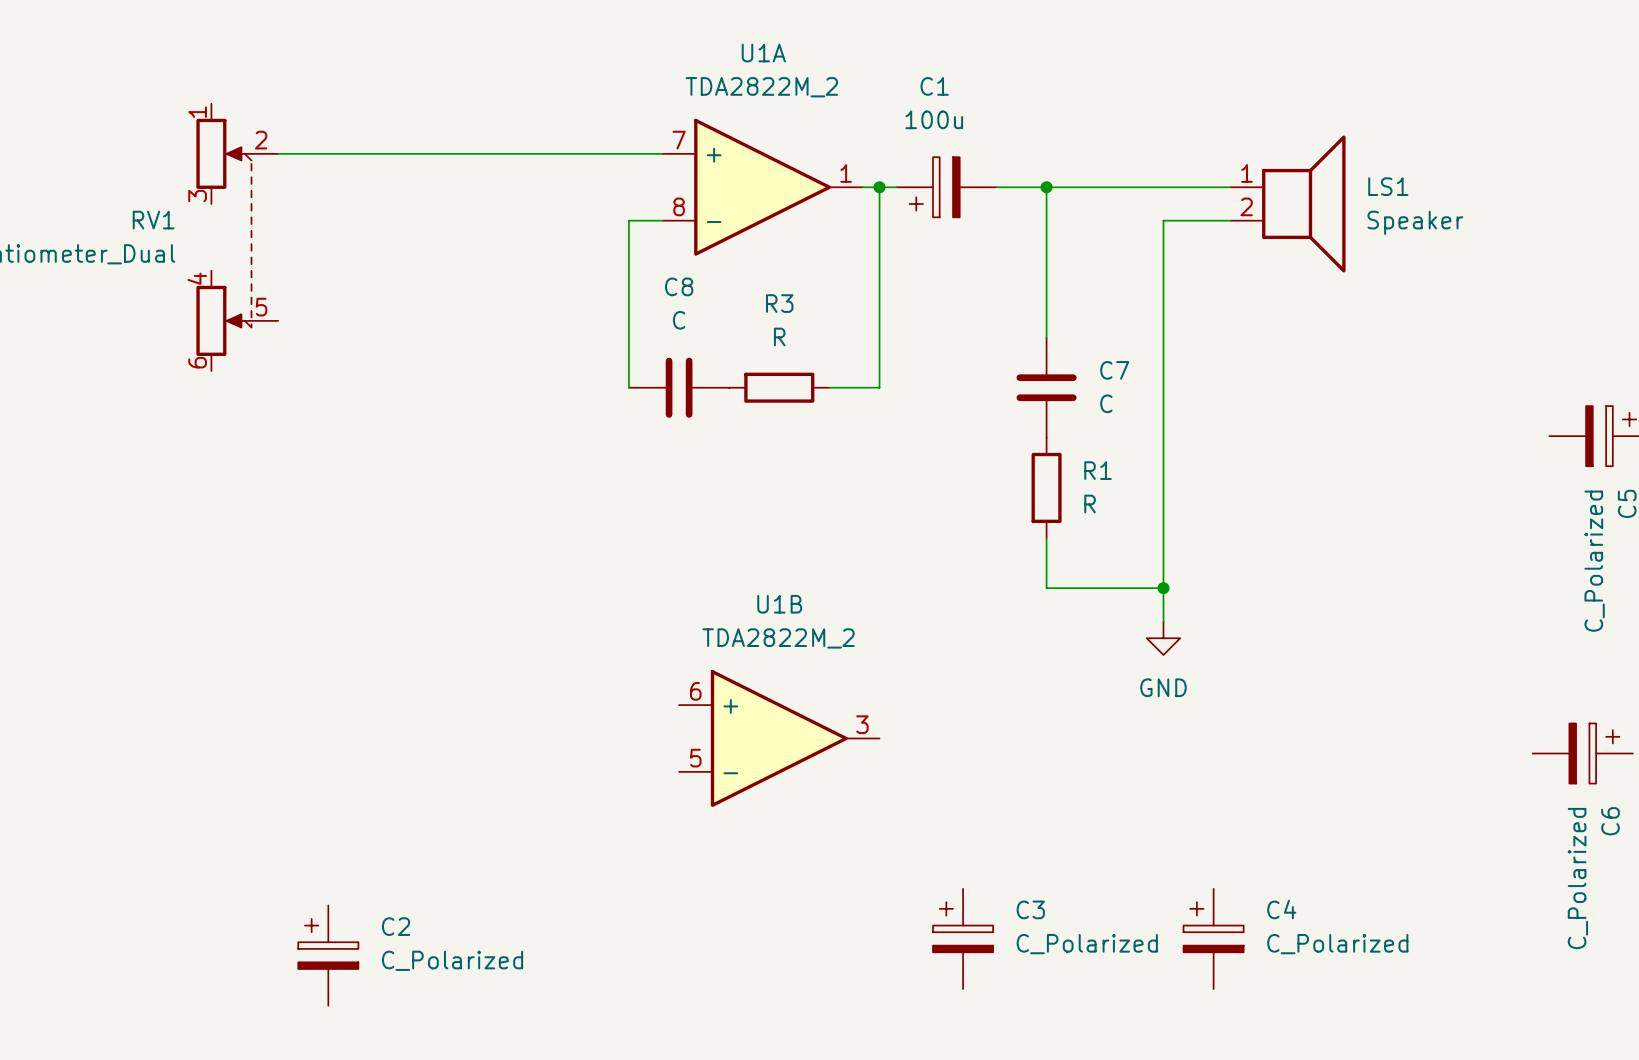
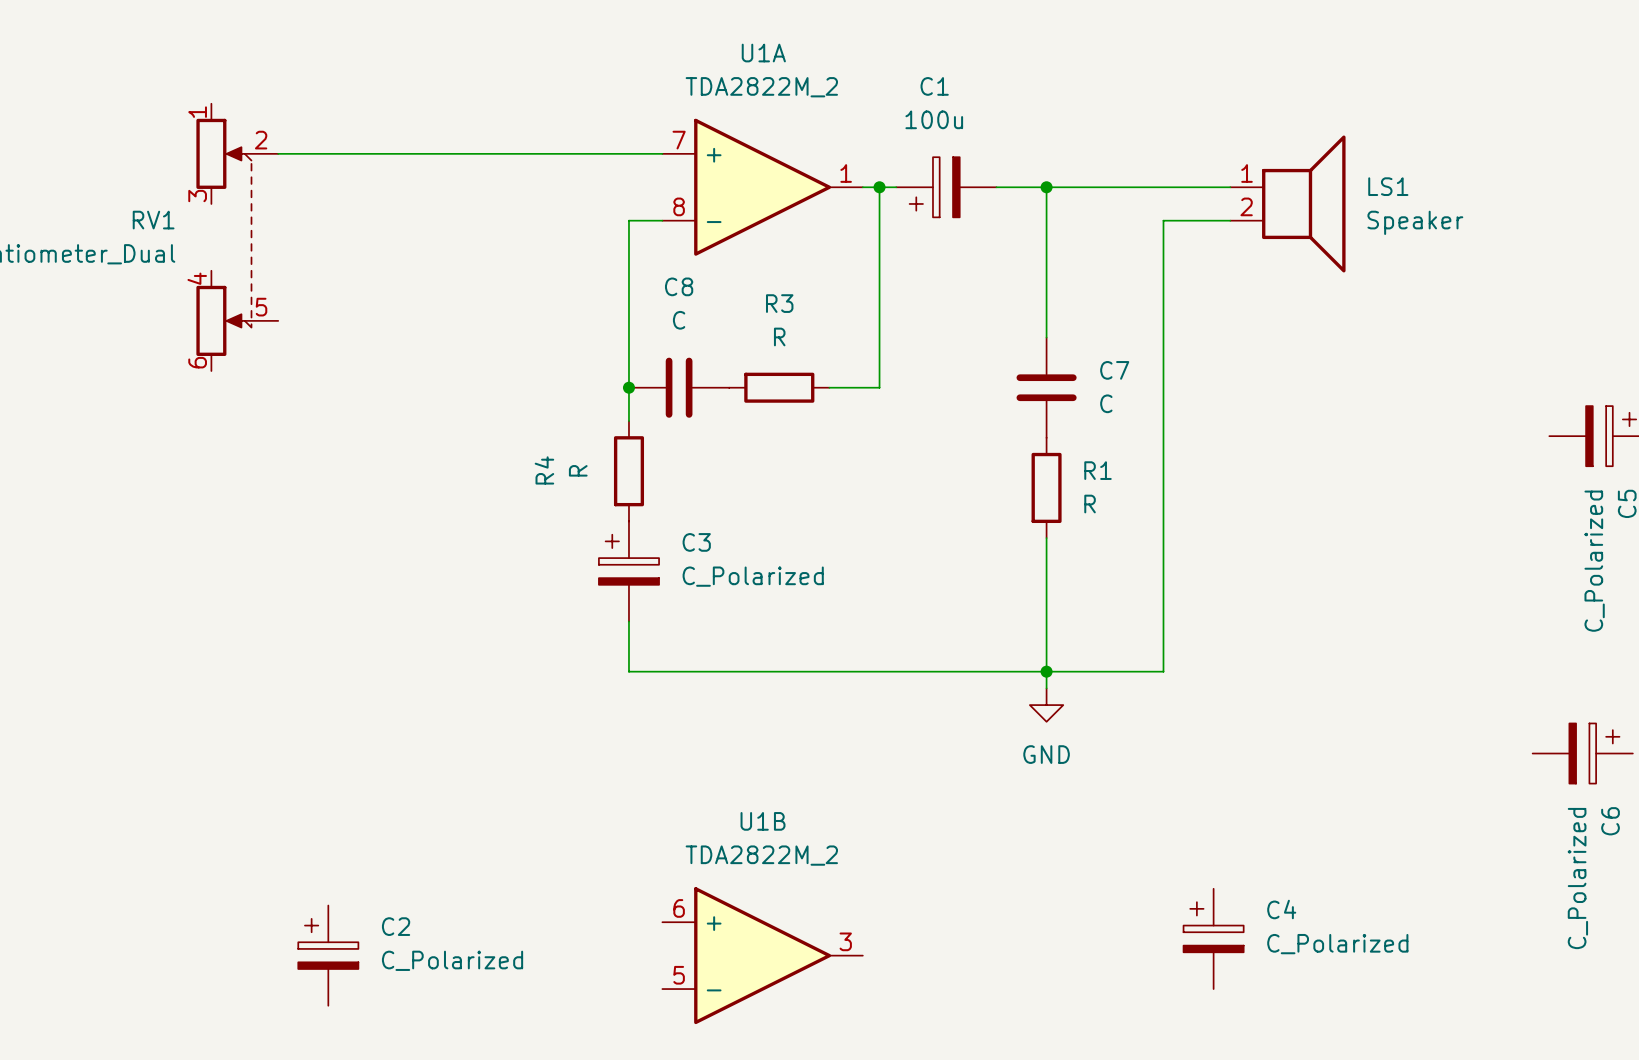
wire: none -> (628, 387) (628, 421)
junction: none -> (628, 387)
R4: none -> R (628, 471)
wire: (1046, 588) (1163, 588) -> (1046, 588) (1046, 688)
junction: (1163, 588) -> none
wire: none -> (628, 621) (628, 671) (1163, 671) (1163, 621)
power symbol position: GND (1163, 638) -> GND (1046, 705)
junction: none -> (1046, 671)
U1B position: (779, 738) -> (762, 955)
C3 position: (963, 938) -> (628, 571)

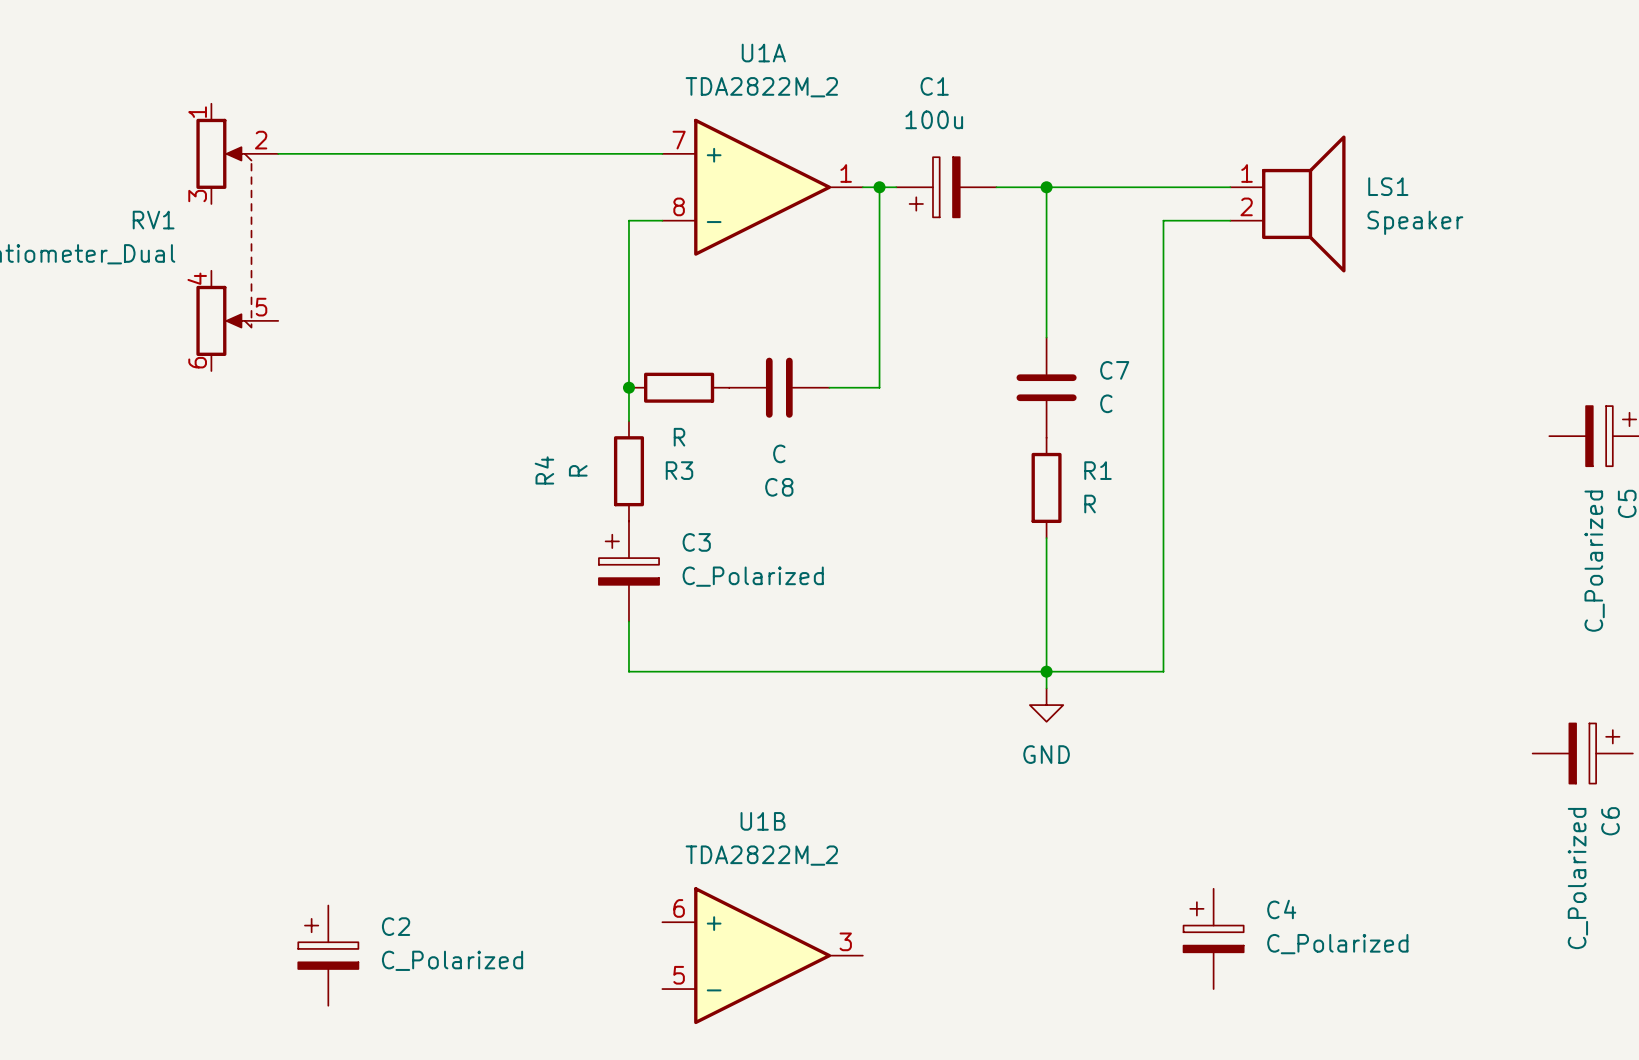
C8 name position: C8 (679, 286) -> C8 (779, 487)
R3 name position: R3 (779, 303) -> R3 (679, 470)
C8 value position: C (679, 320) -> C (779, 453)
R3 value position: R (779, 336) -> R (679, 437)
C8 position: (679, 387) -> (779, 387)
R3 position: (779, 387) -> (679, 387)

